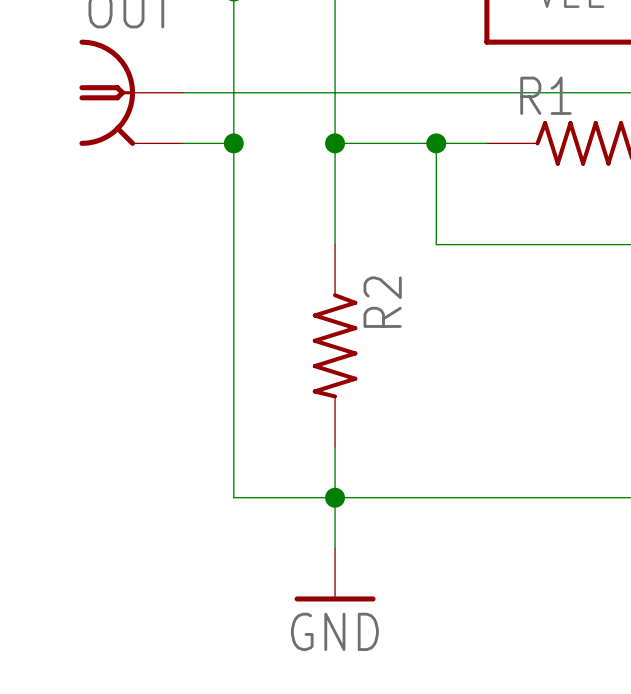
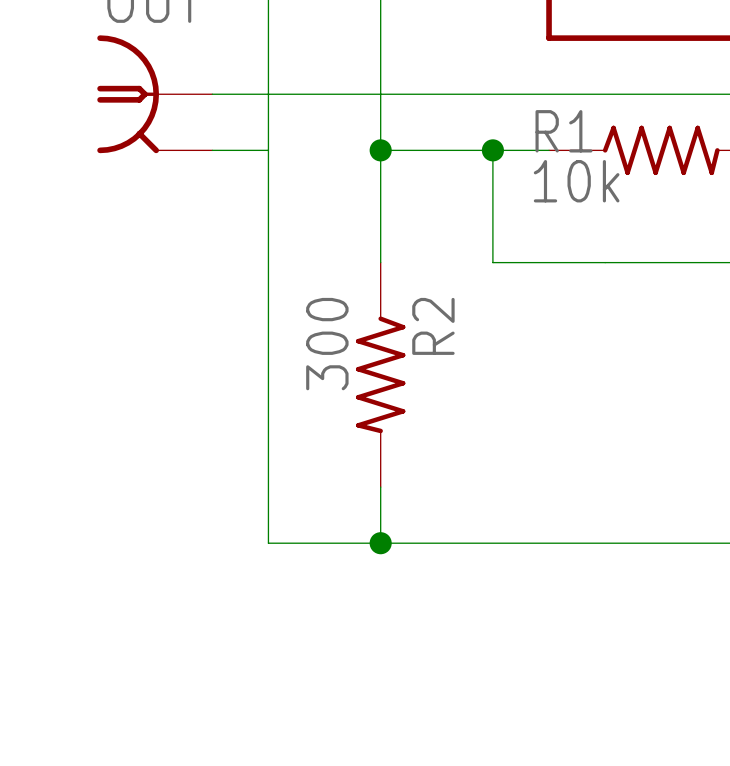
R1 name position: R1 (545, 95) -> R1 (564, 131)
junction: (233, 143) -> none
R1 value: none -> 10k (576, 181)
R2 value: none -> 300 (327, 344)
wire: (335, 497) (335, 548) -> none
power symbol: GND (335, 574) -> none

